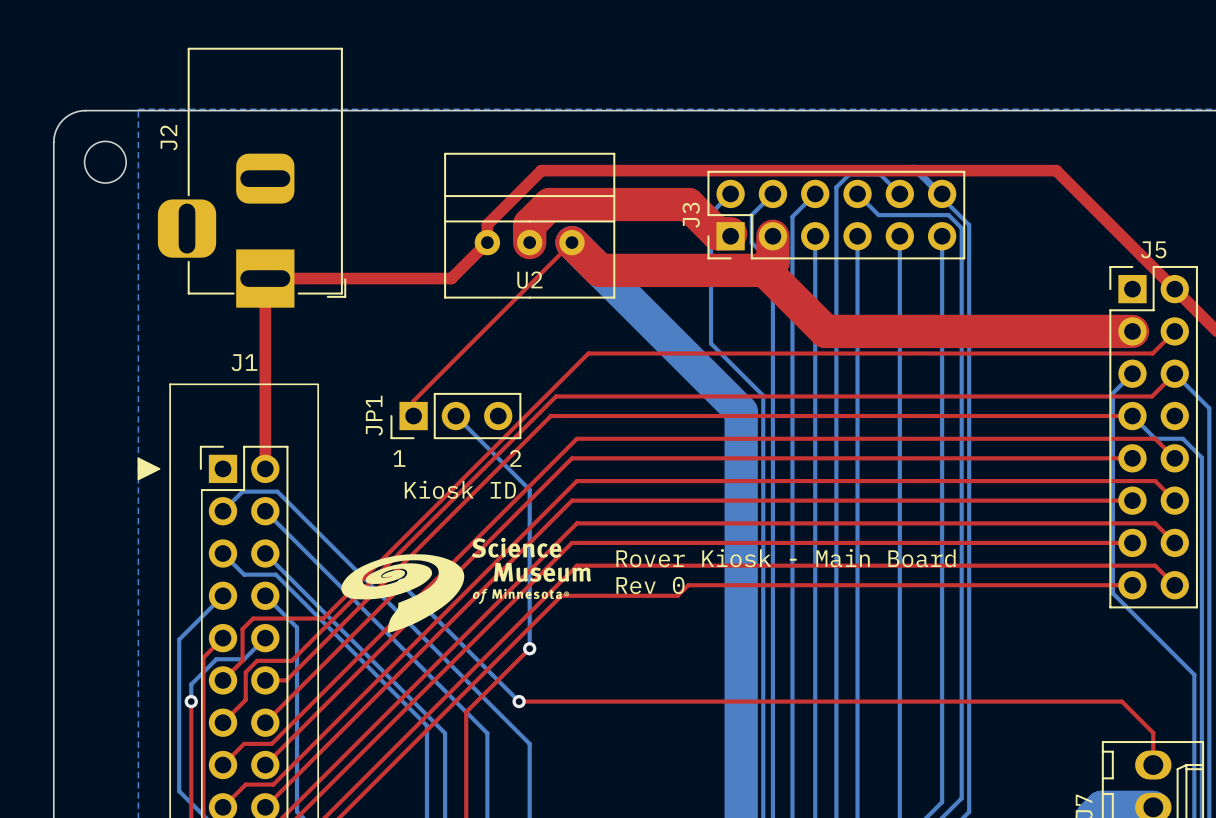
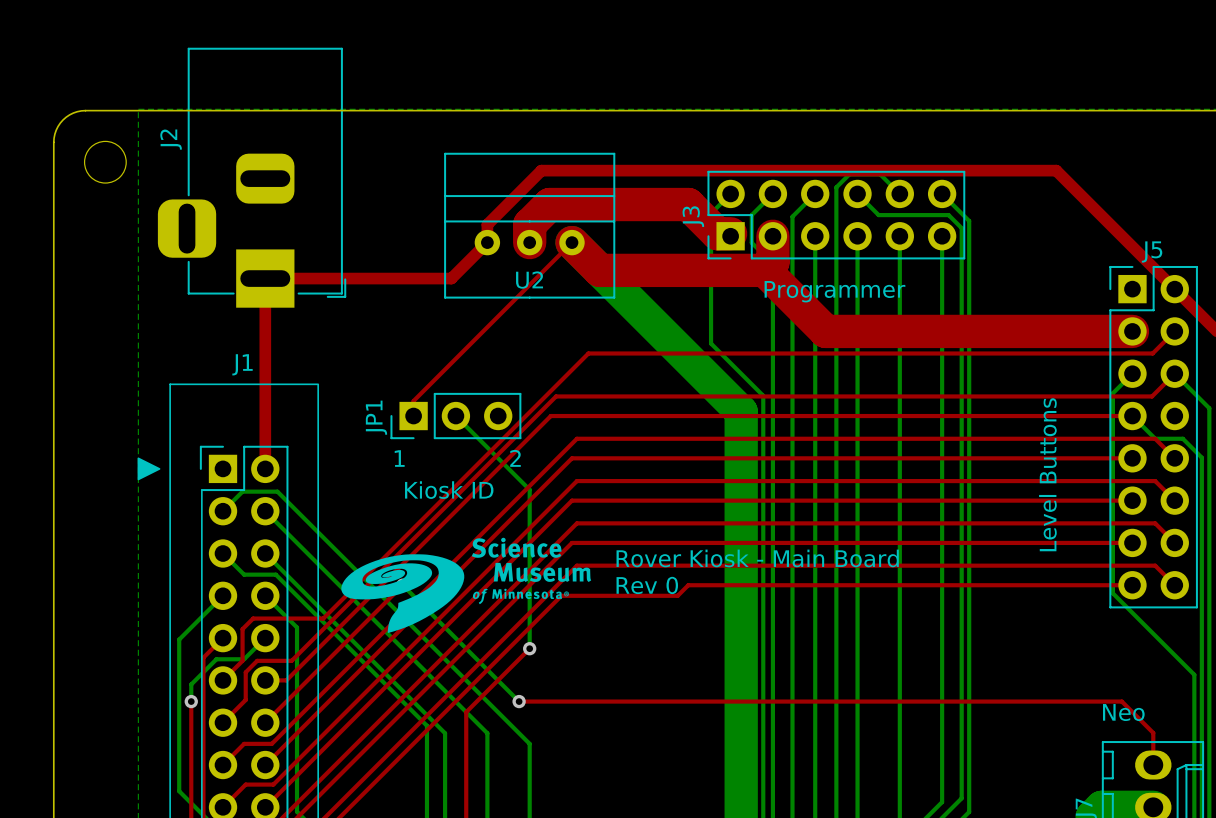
bottom track: (942, 193) (915, 166) (911, 166) (969, 225) -> (942, 193) (969, 221) (969, 225)
text: none -> Programmer (834, 291)
text: none -> Level Buttons (1047, 474)
text: none -> Neo (1123, 712)

